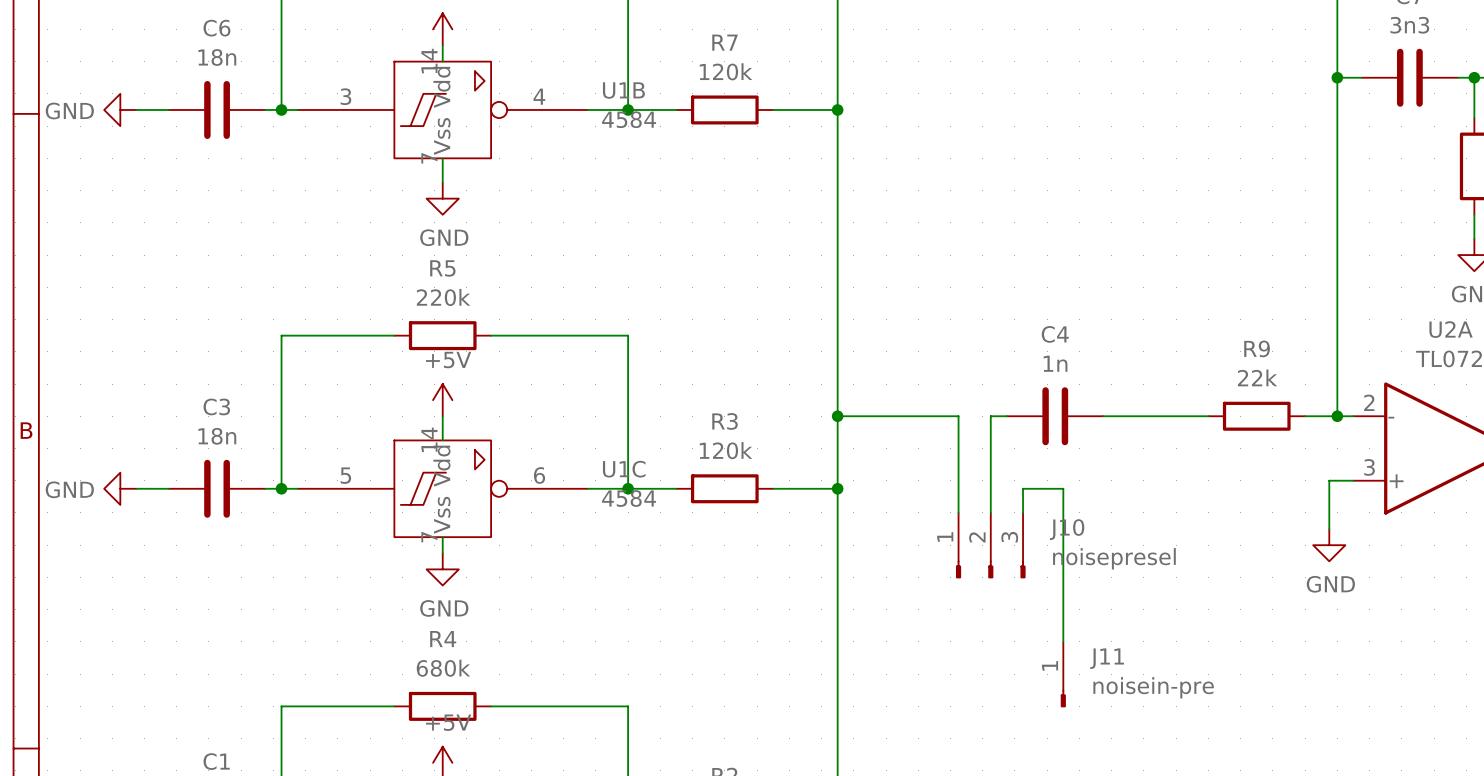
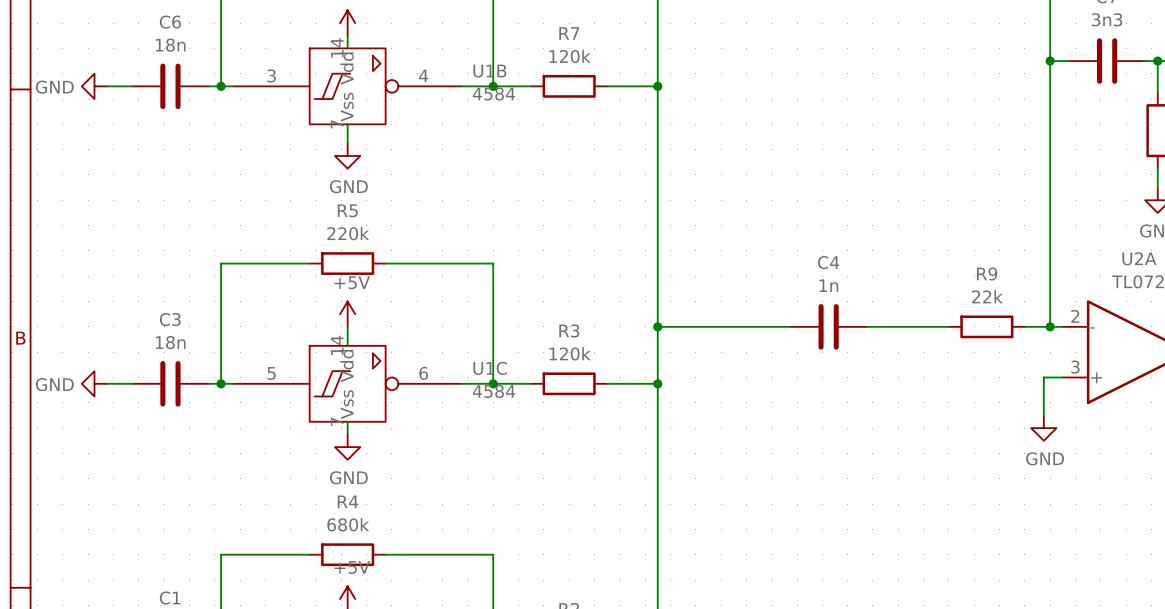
wire: (958, 416) (958, 512) -> (752, 326) (778, 326)
wire: (990, 416) (990, 512) -> none
wire: (1023, 512) (1023, 488) (1063, 488) (1063, 641) -> none
J10: noisepresel (990, 545) -> none
J11: noisein-pre (1063, 674) -> none

